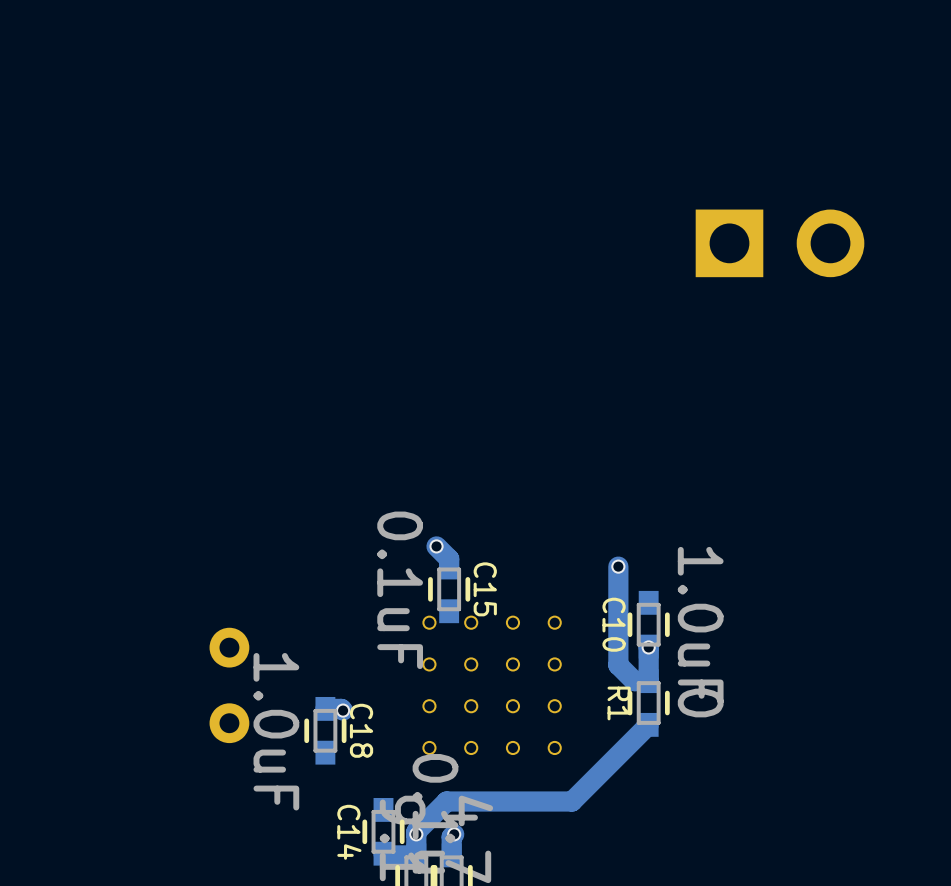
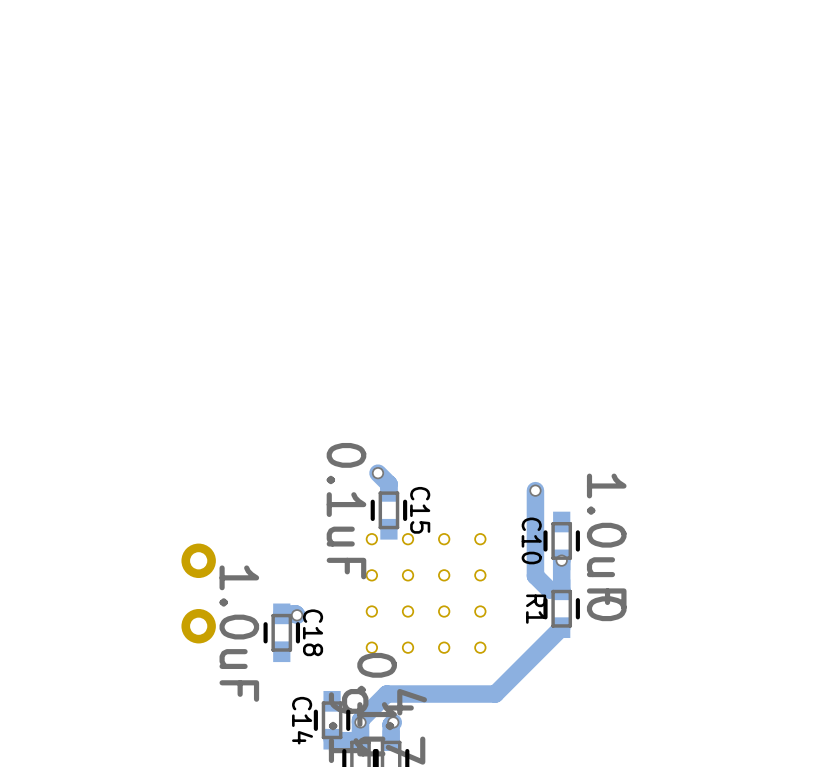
part: (780, 243) -> none

